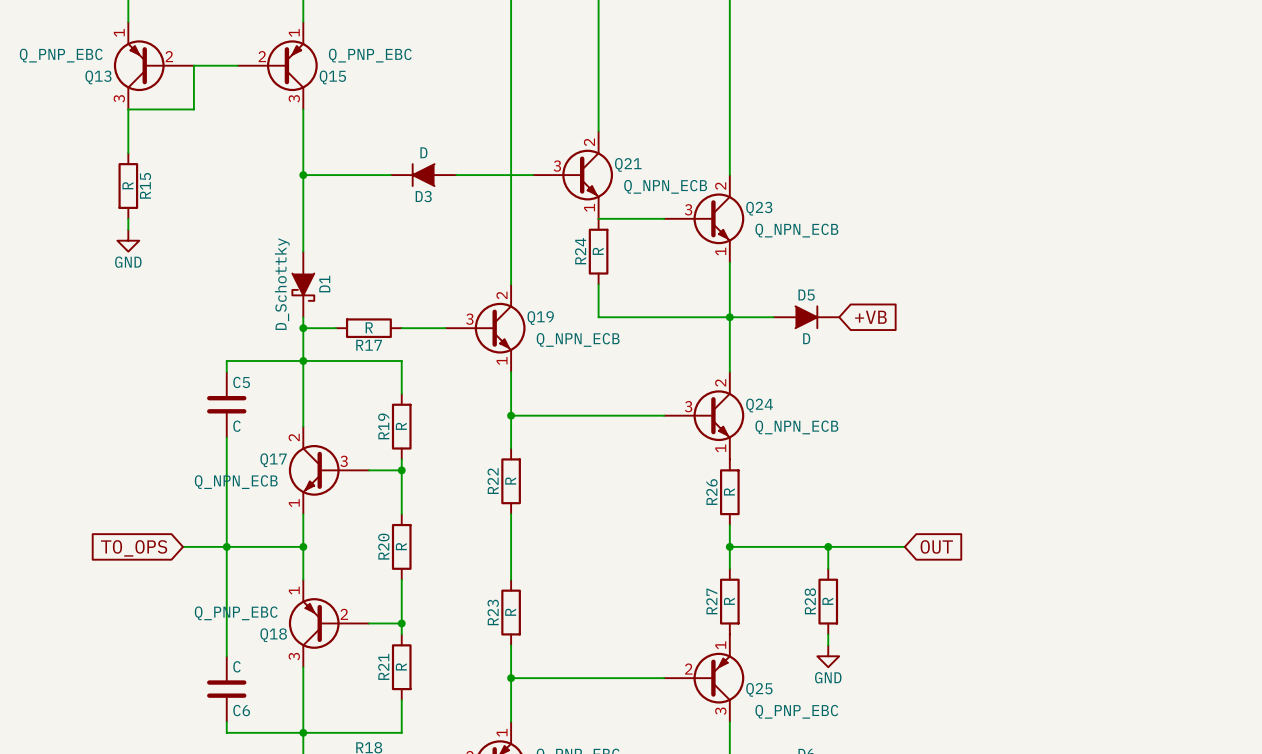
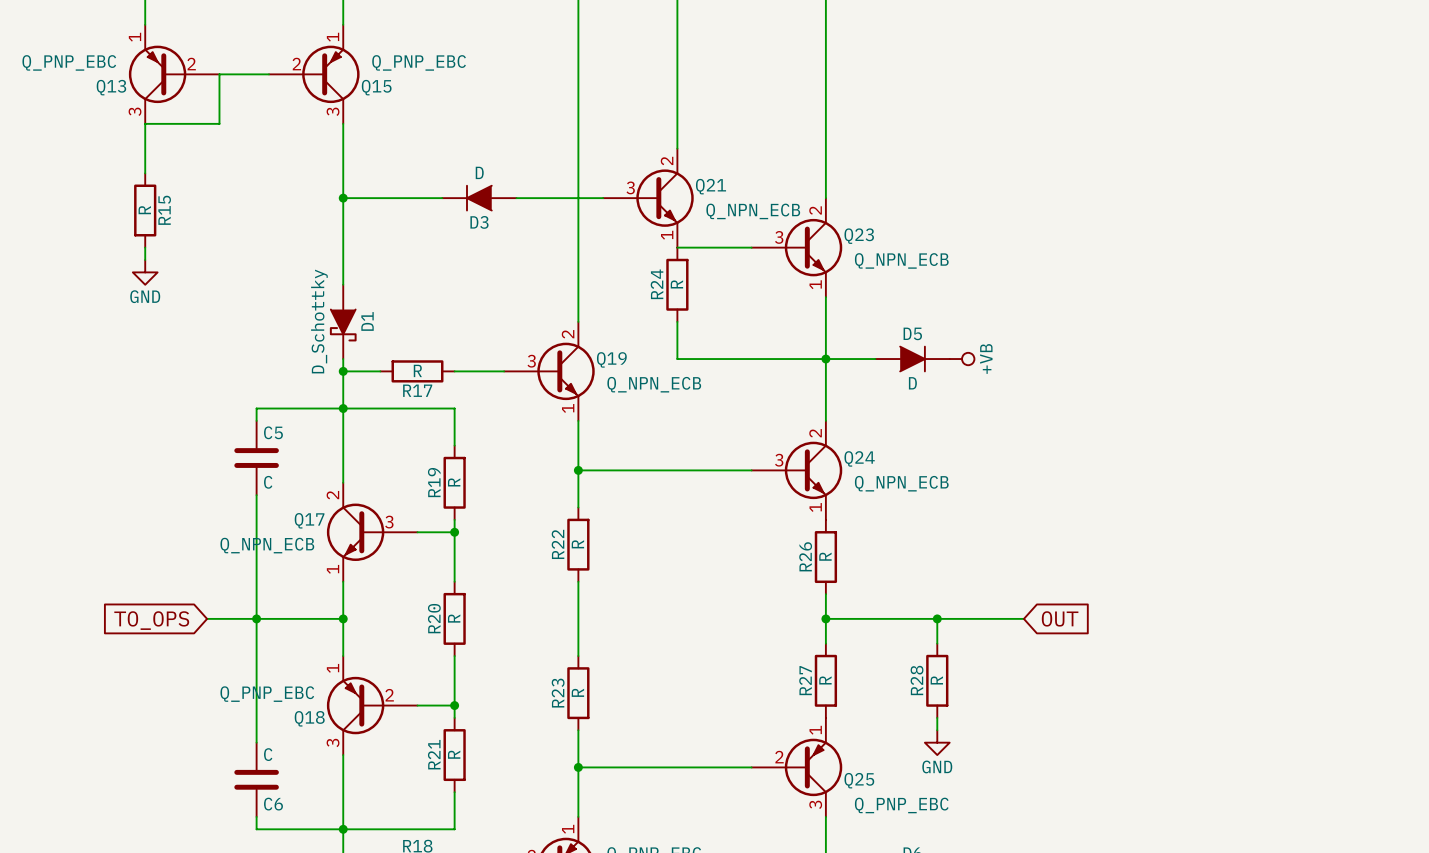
power symbol: none -> +VB (962, 359)
global label: +VB (870, 317) -> none

